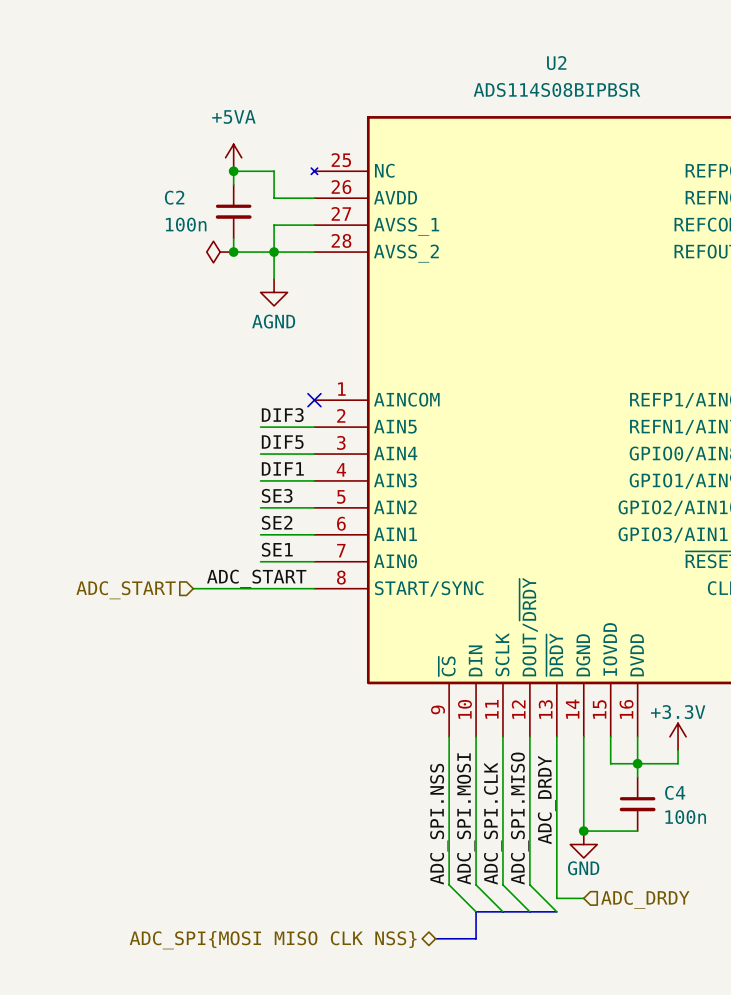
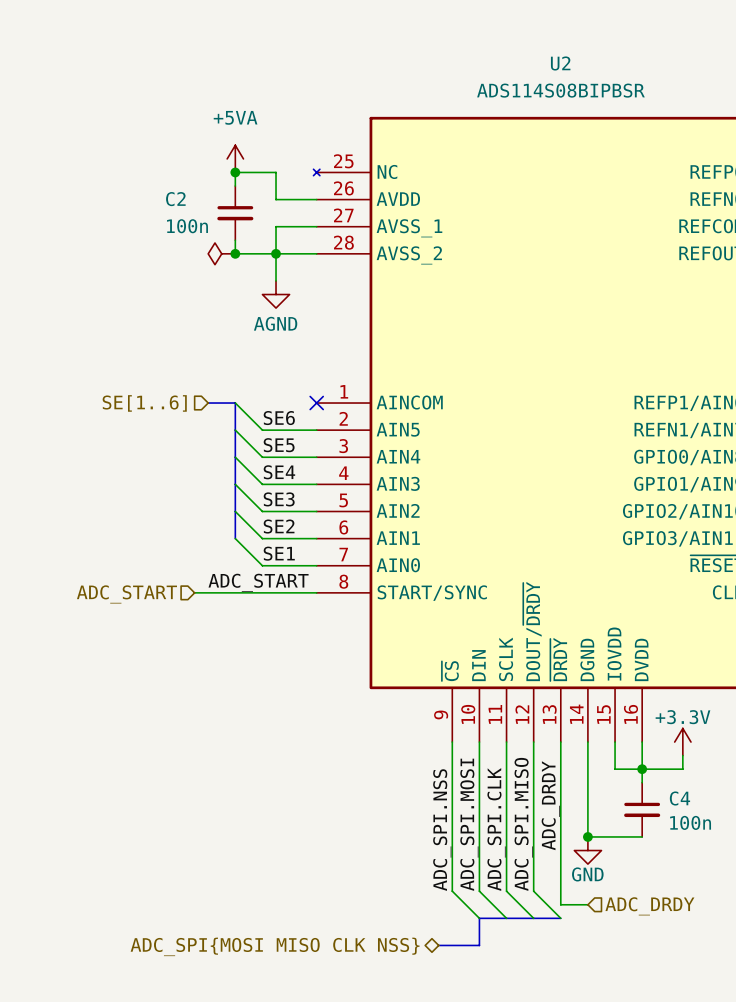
hierarchical label: none -> SE[1..6] (144, 403)
bus: none -> (208, 403) (235, 403) (235, 538)
wire: none -> (235, 403) (262, 430)
label: DIF3 (282, 415) -> SE6 (279, 418)
wire: none -> (235, 430) (262, 457)
label: DIF5 (282, 442) -> SE5 (279, 445)
wire: none -> (235, 457) (262, 484)
label: DIF1 (282, 468) -> SE4 (279, 472)
wire: none -> (235, 484) (262, 511)
wire: none -> (235, 511) (262, 538)
wire: none -> (235, 538) (262, 565)

